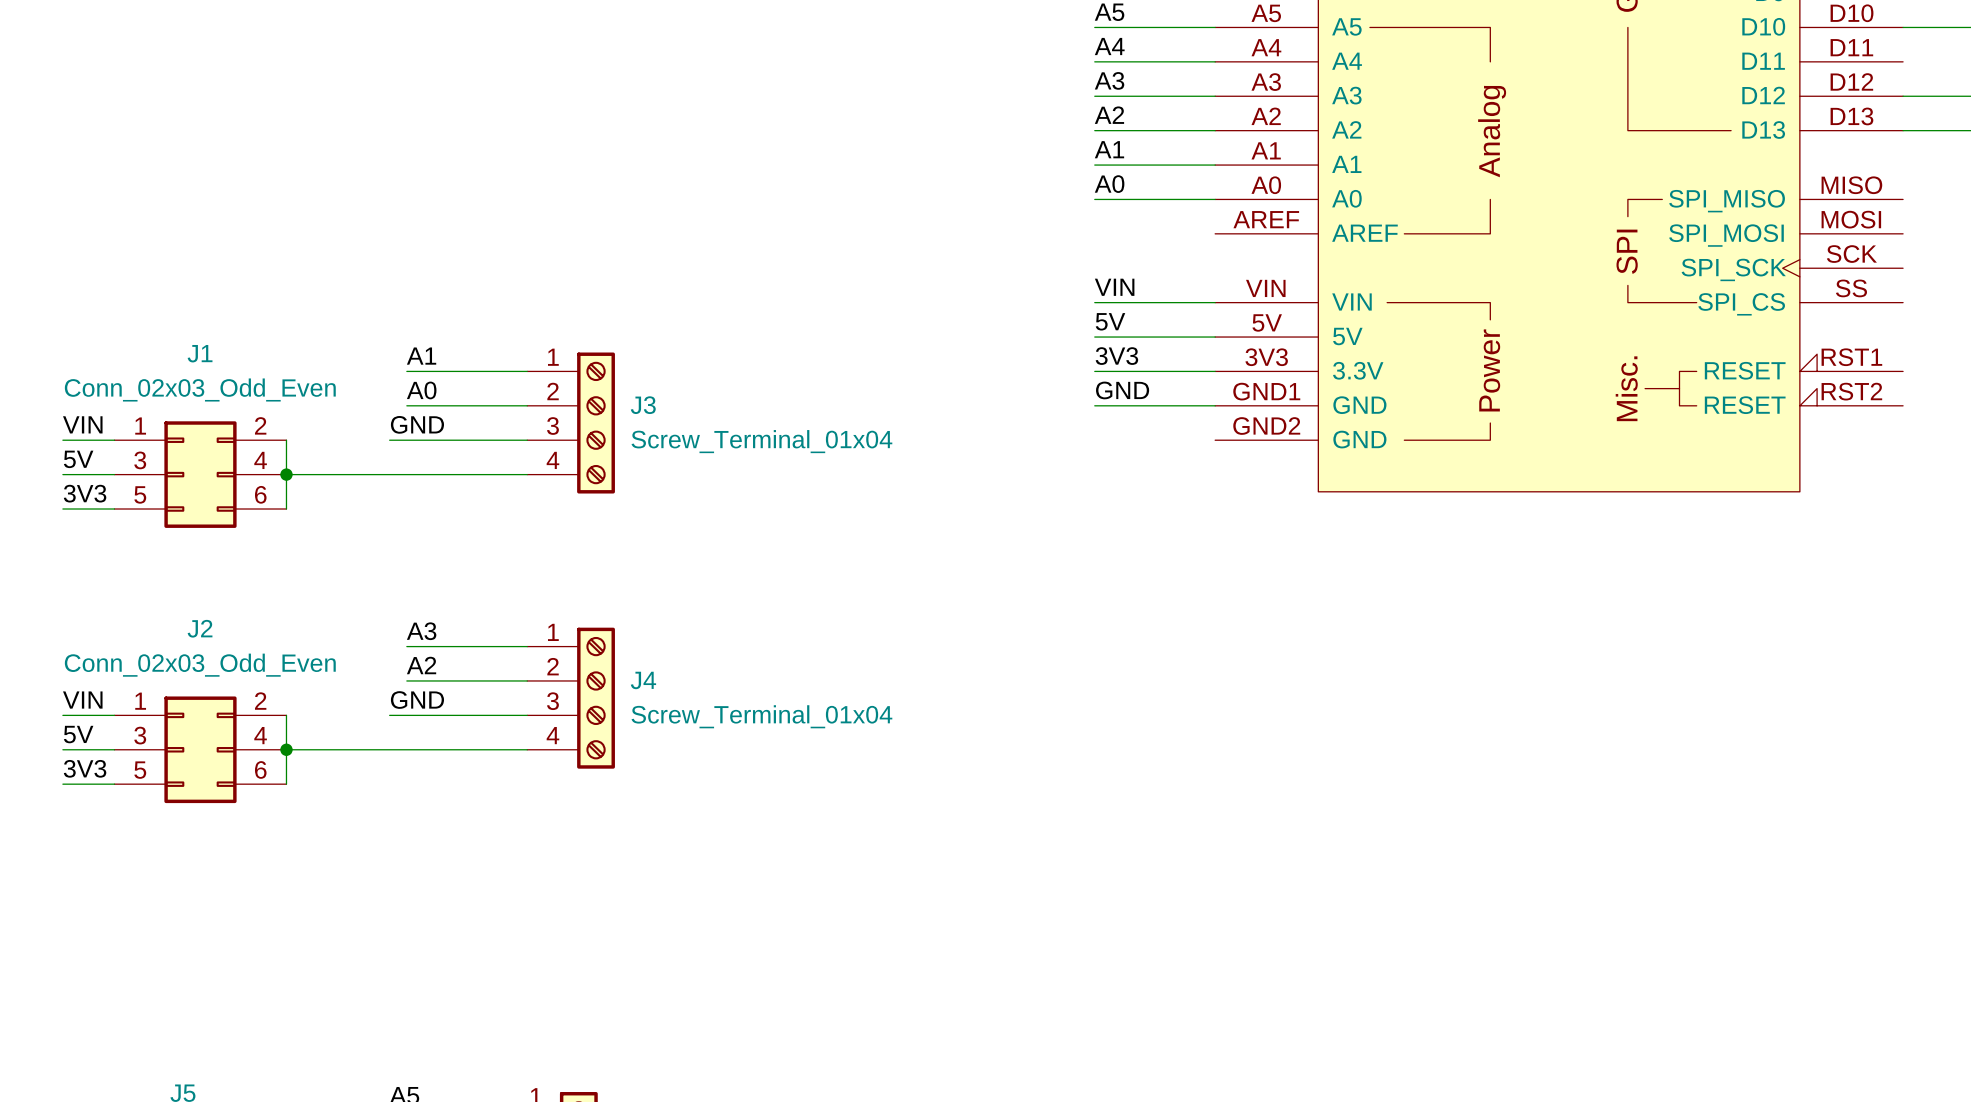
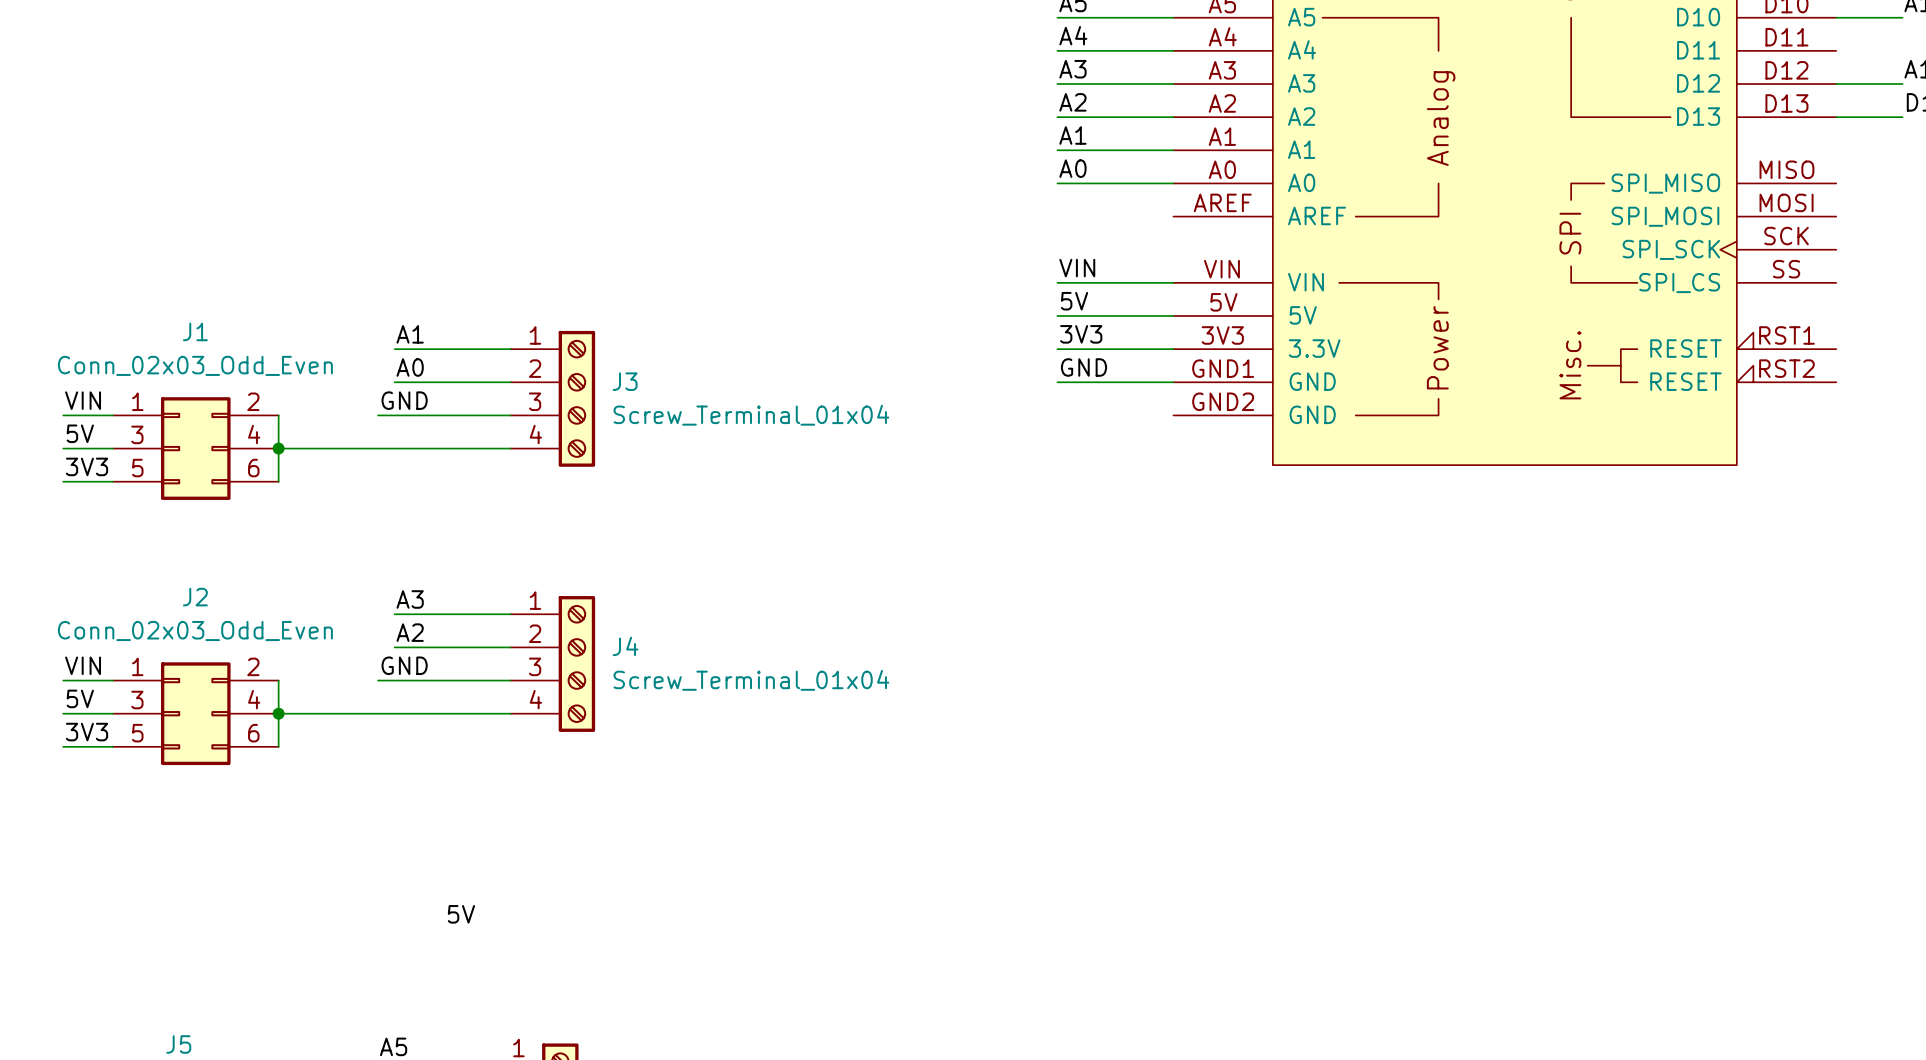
label: none -> 5V (461, 914)

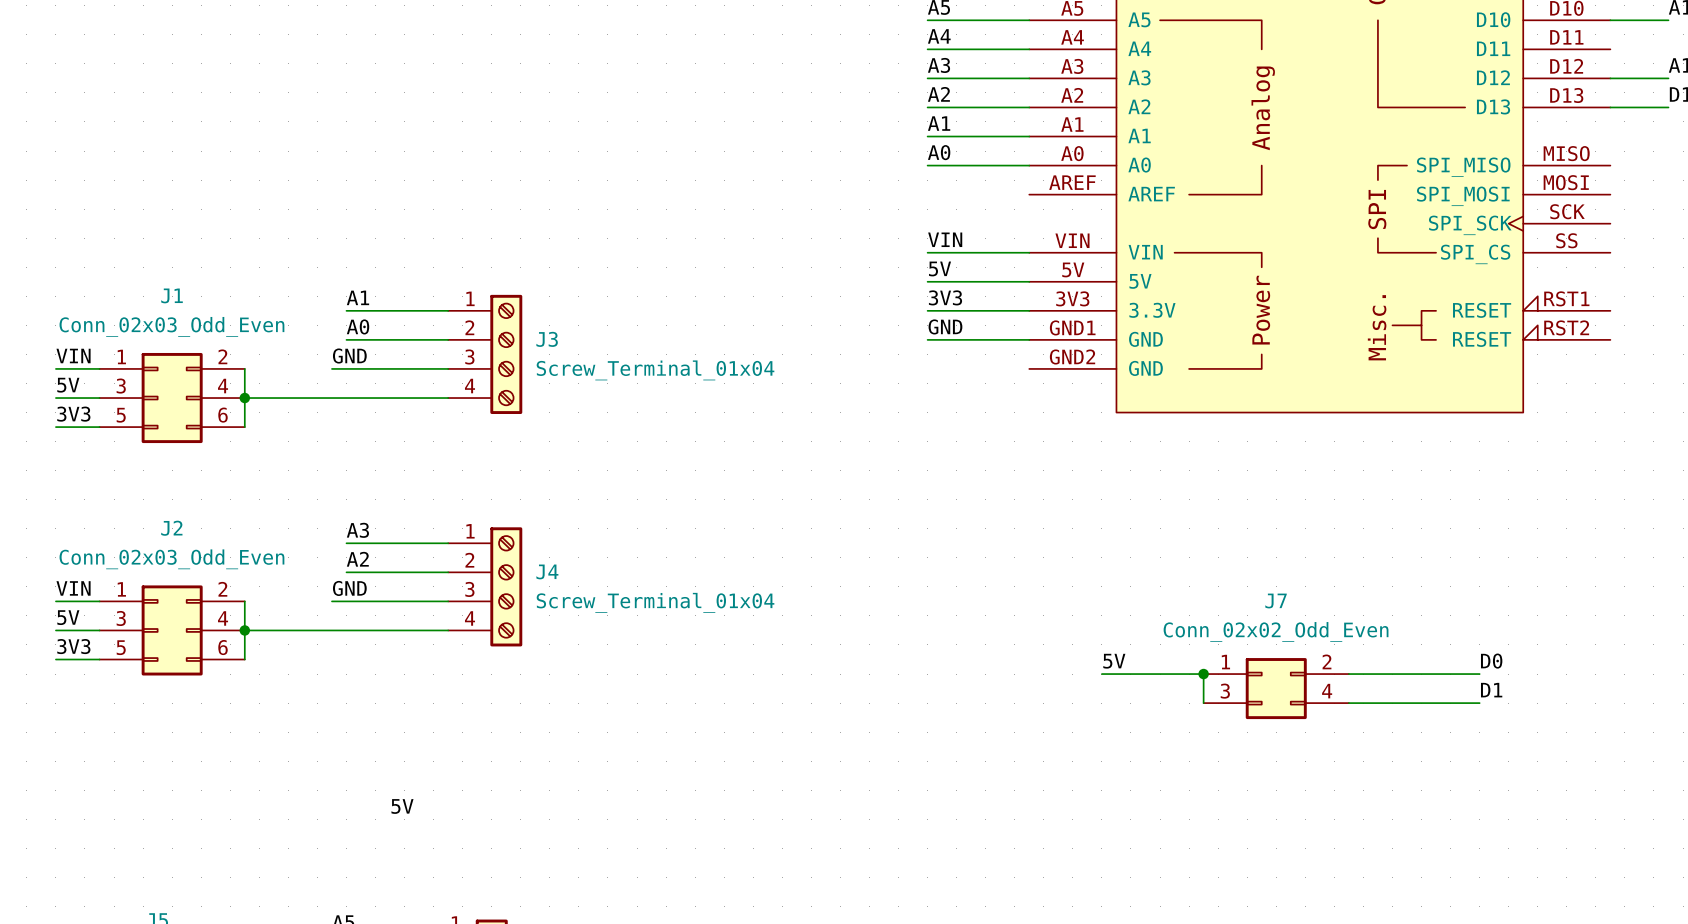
label: none -> 5V (1114, 661)
label: none -> D0 (1491, 661)
wire: none -> (1101, 674) (1203, 674) (1203, 703)
junction: none -> (1203, 674)
wire: none -> (1348, 674) (1479, 674)
J7: none -> Conn_02x02_Odd_Even (1276, 688)
label: none -> D1 (1491, 690)
wire: none -> (1348, 703) (1479, 703)

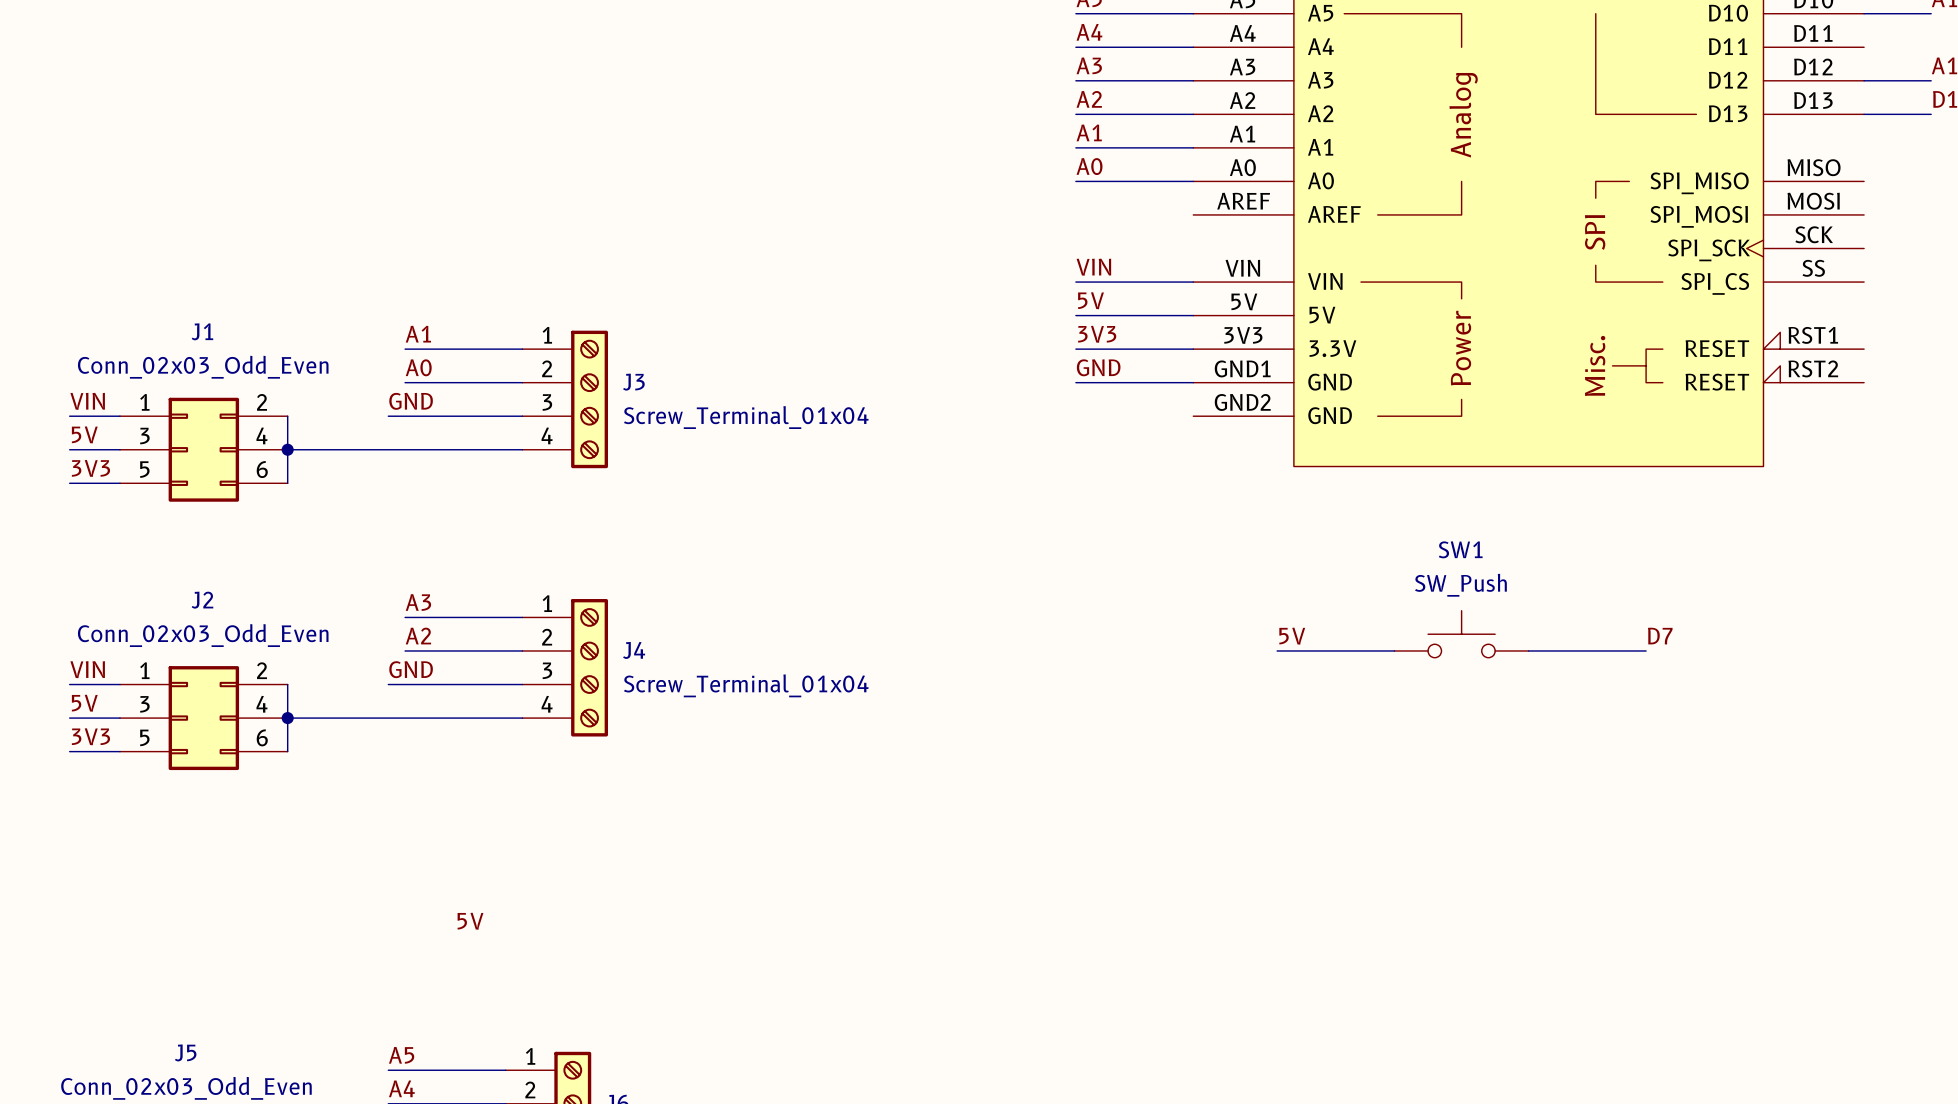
SW1: none -> SW_Push (1461, 634)
label: none -> D7 (1660, 636)
wire: none -> (1277, 650) (1394, 650)
wire: none -> (1528, 650) (1646, 650)
label position: 5V (1114, 661) -> 5V (1292, 636)
label: D0 (1491, 661) -> none
wire: (1101, 674) (1203, 674) (1203, 703) -> none
junction: (1203, 674) -> none
wire: (1348, 674) (1479, 674) -> none
J7: Conn_02x02_Odd_Even (1276, 688) -> none
label: D1 (1491, 690) -> none
wire: (1348, 703) (1479, 703) -> none

